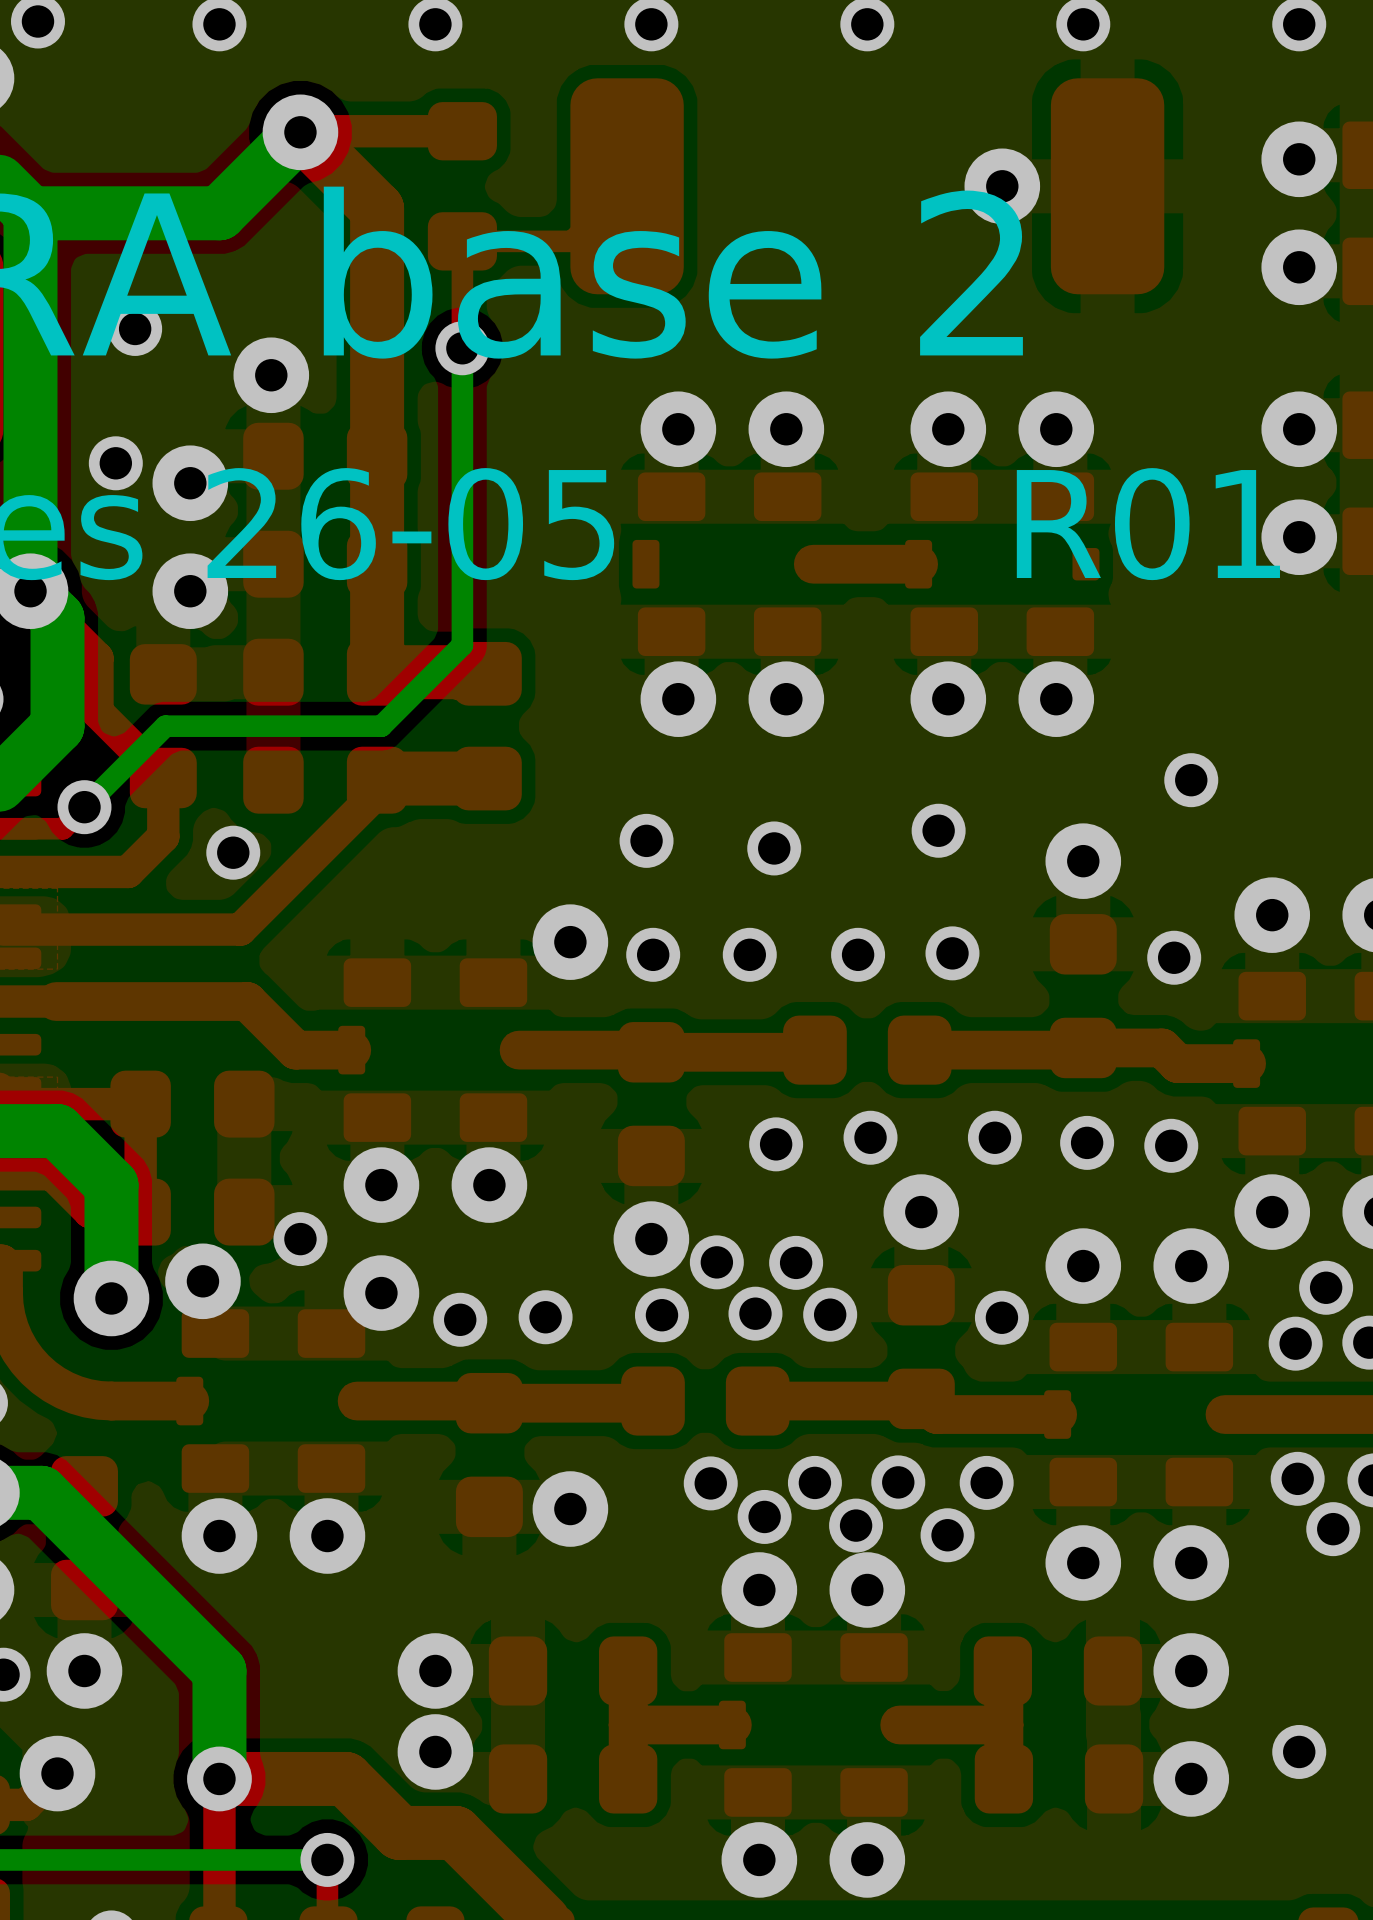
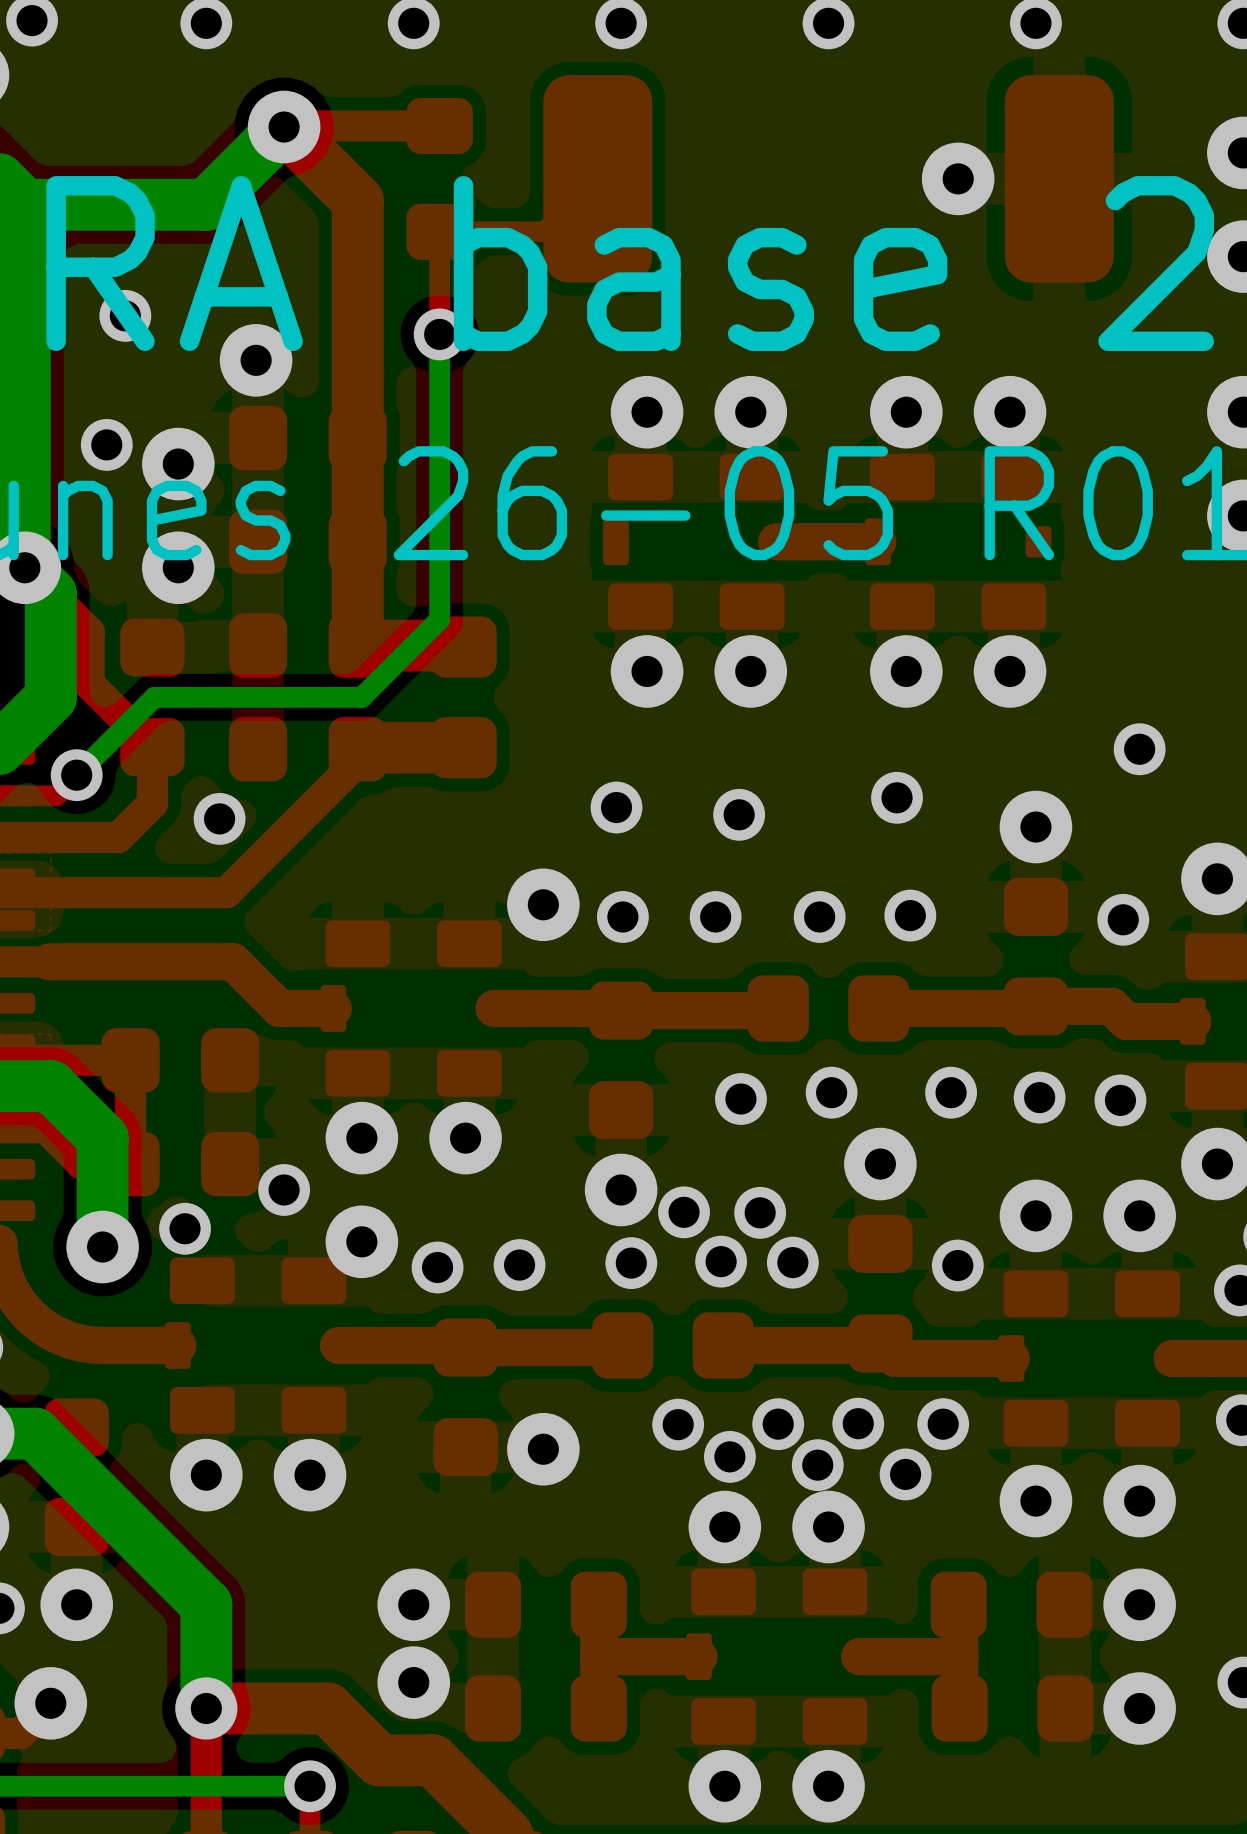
via size: [165, 1243, 241, 1320] -> [159, 1202, 211, 1255]

